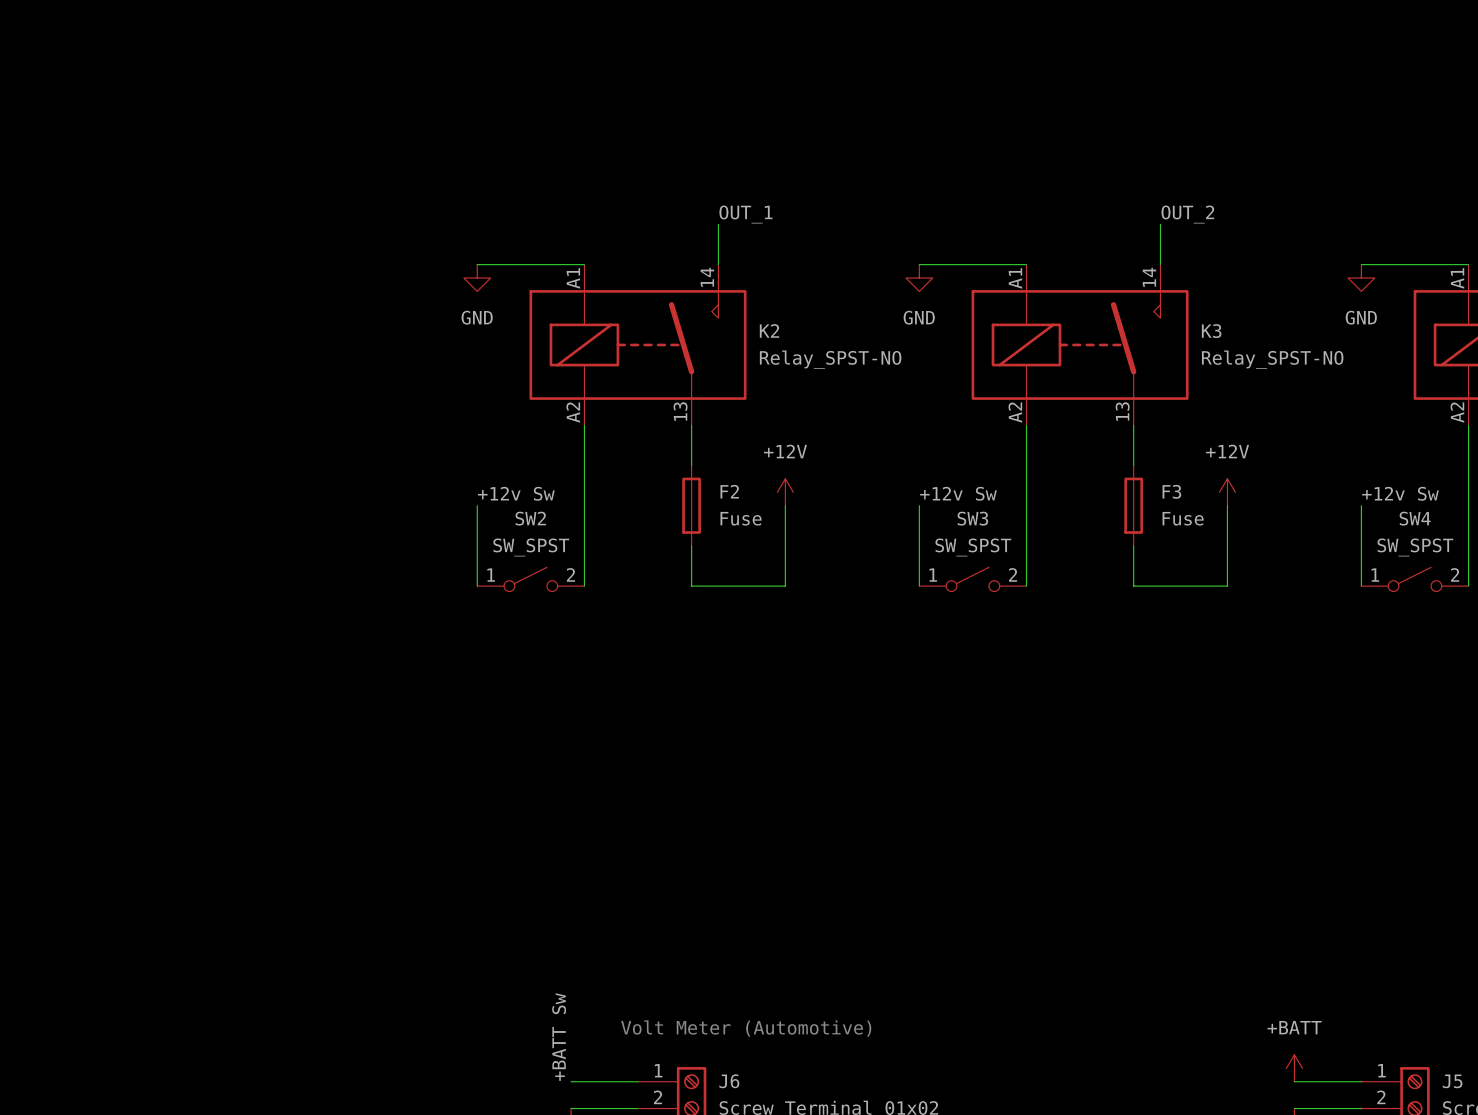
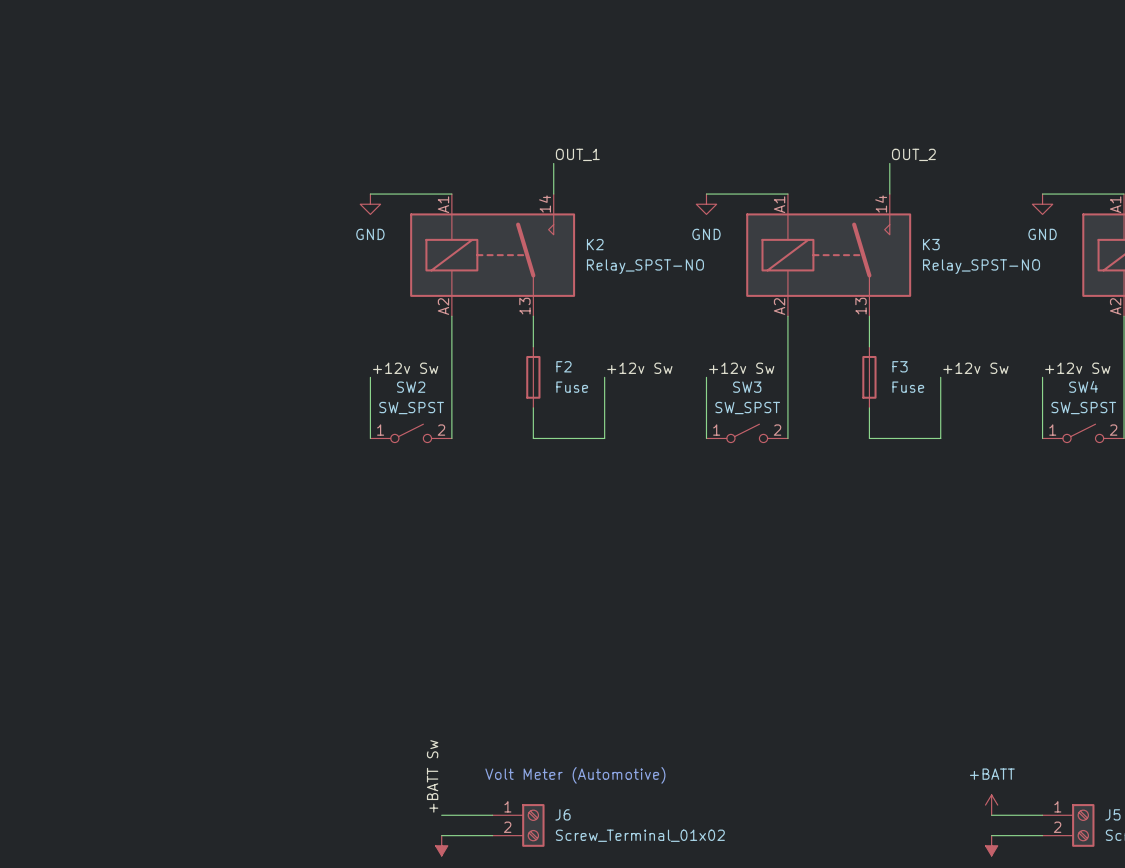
power symbol: +12V (785, 492) -> none
power symbol: +12V (1227, 492) -> none
label: none -> +12v Sw (639, 368)
label: none -> +12v Sw (975, 368)

